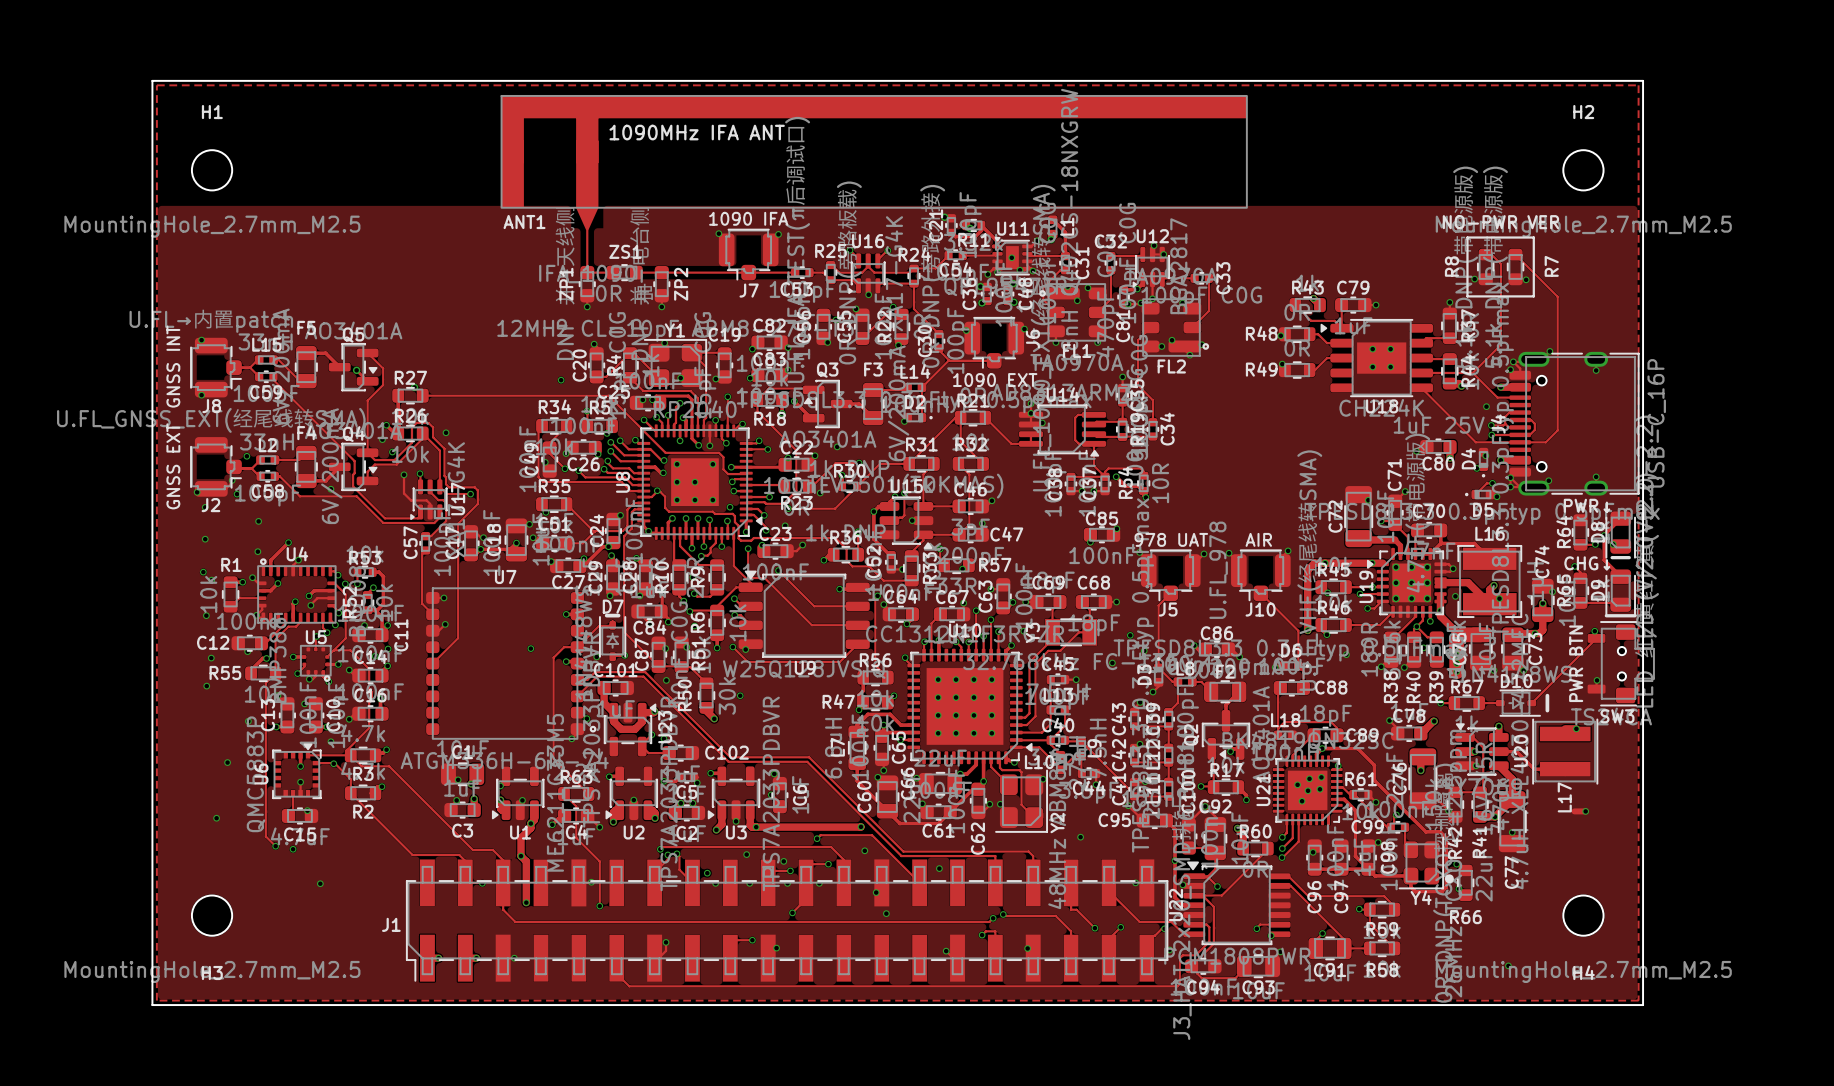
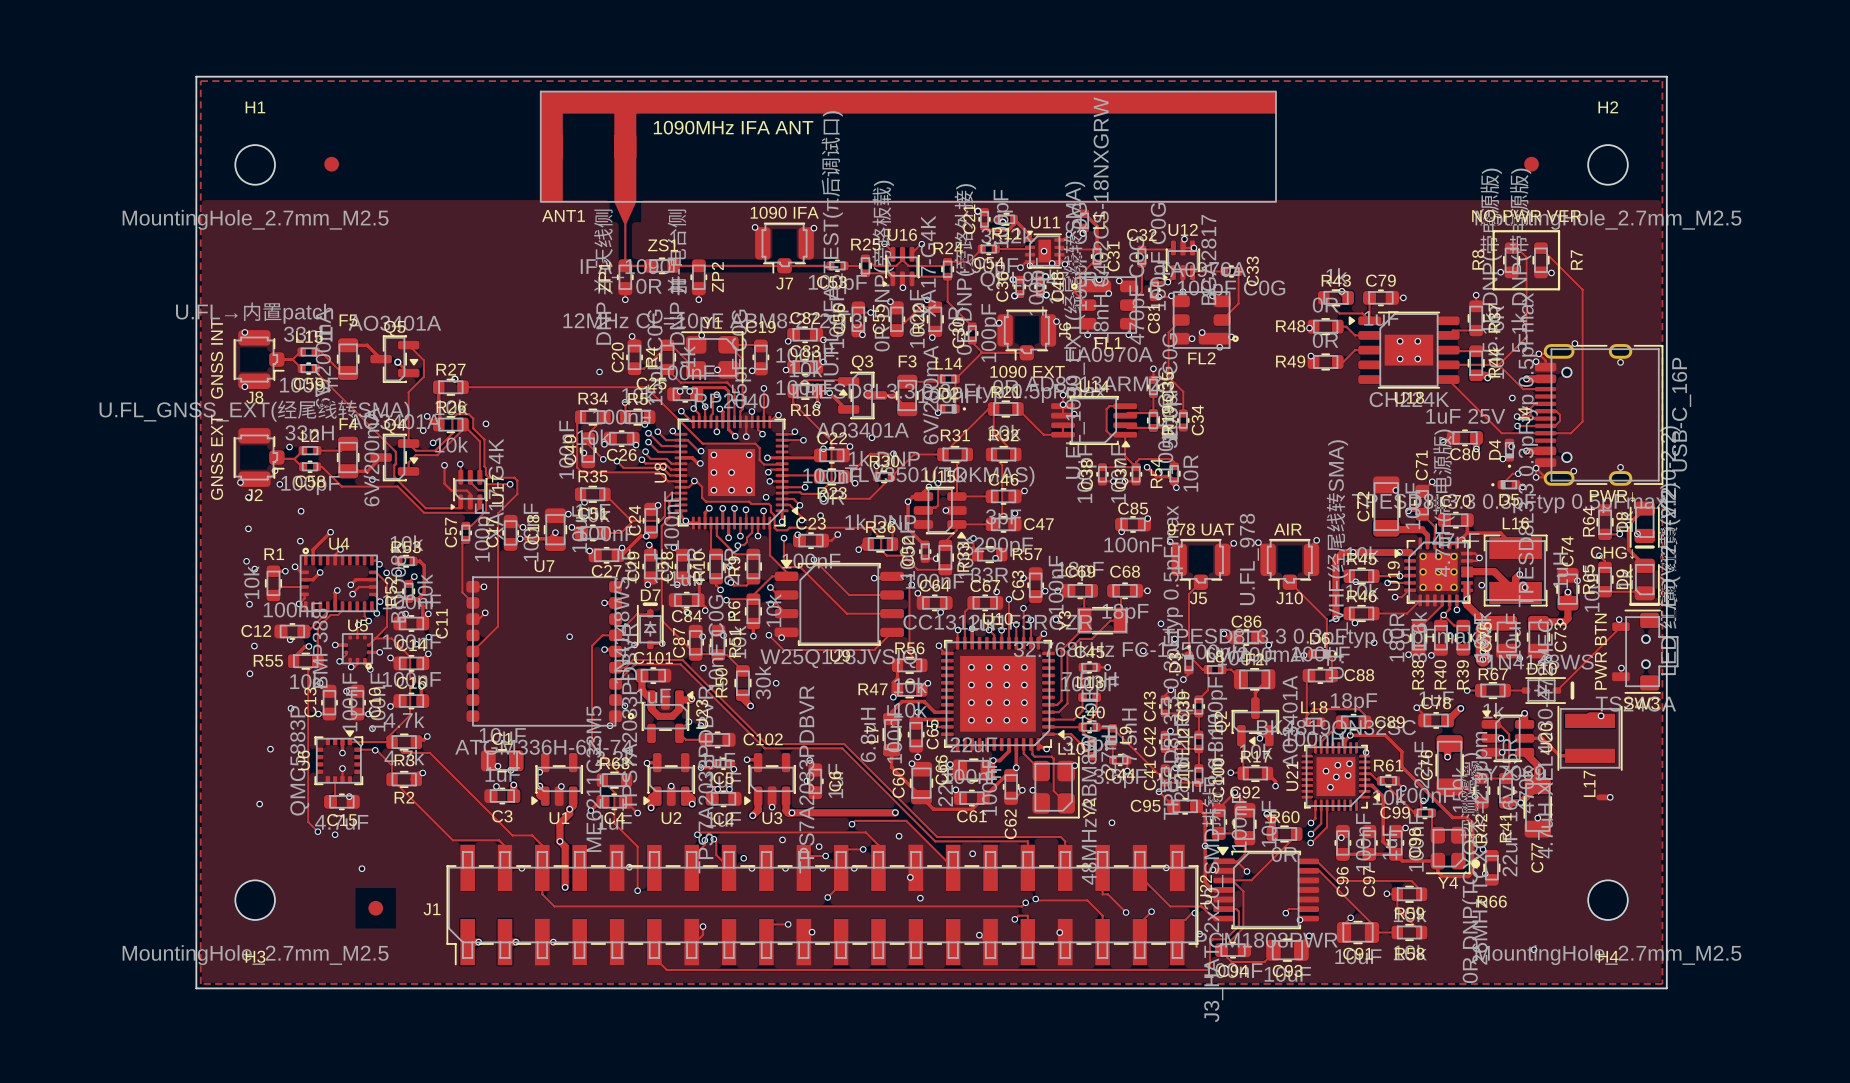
part: none -> (331, 164)
part: none -> (1531, 164)
part: none -> (375, 908)

